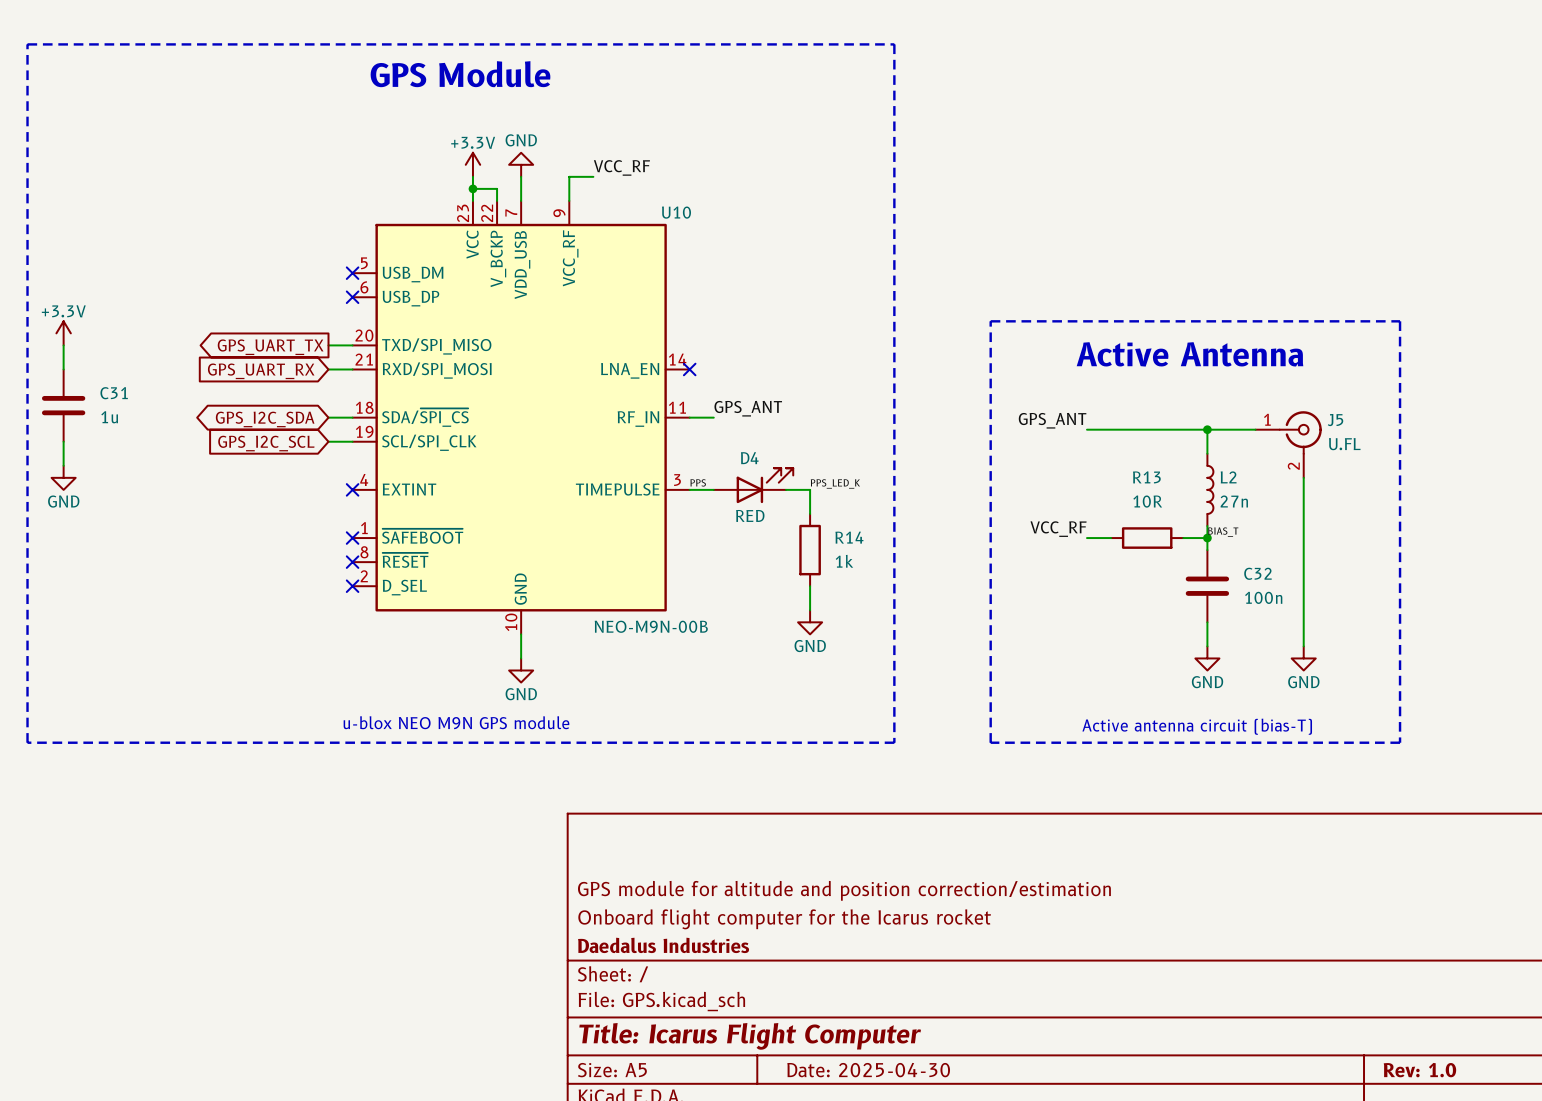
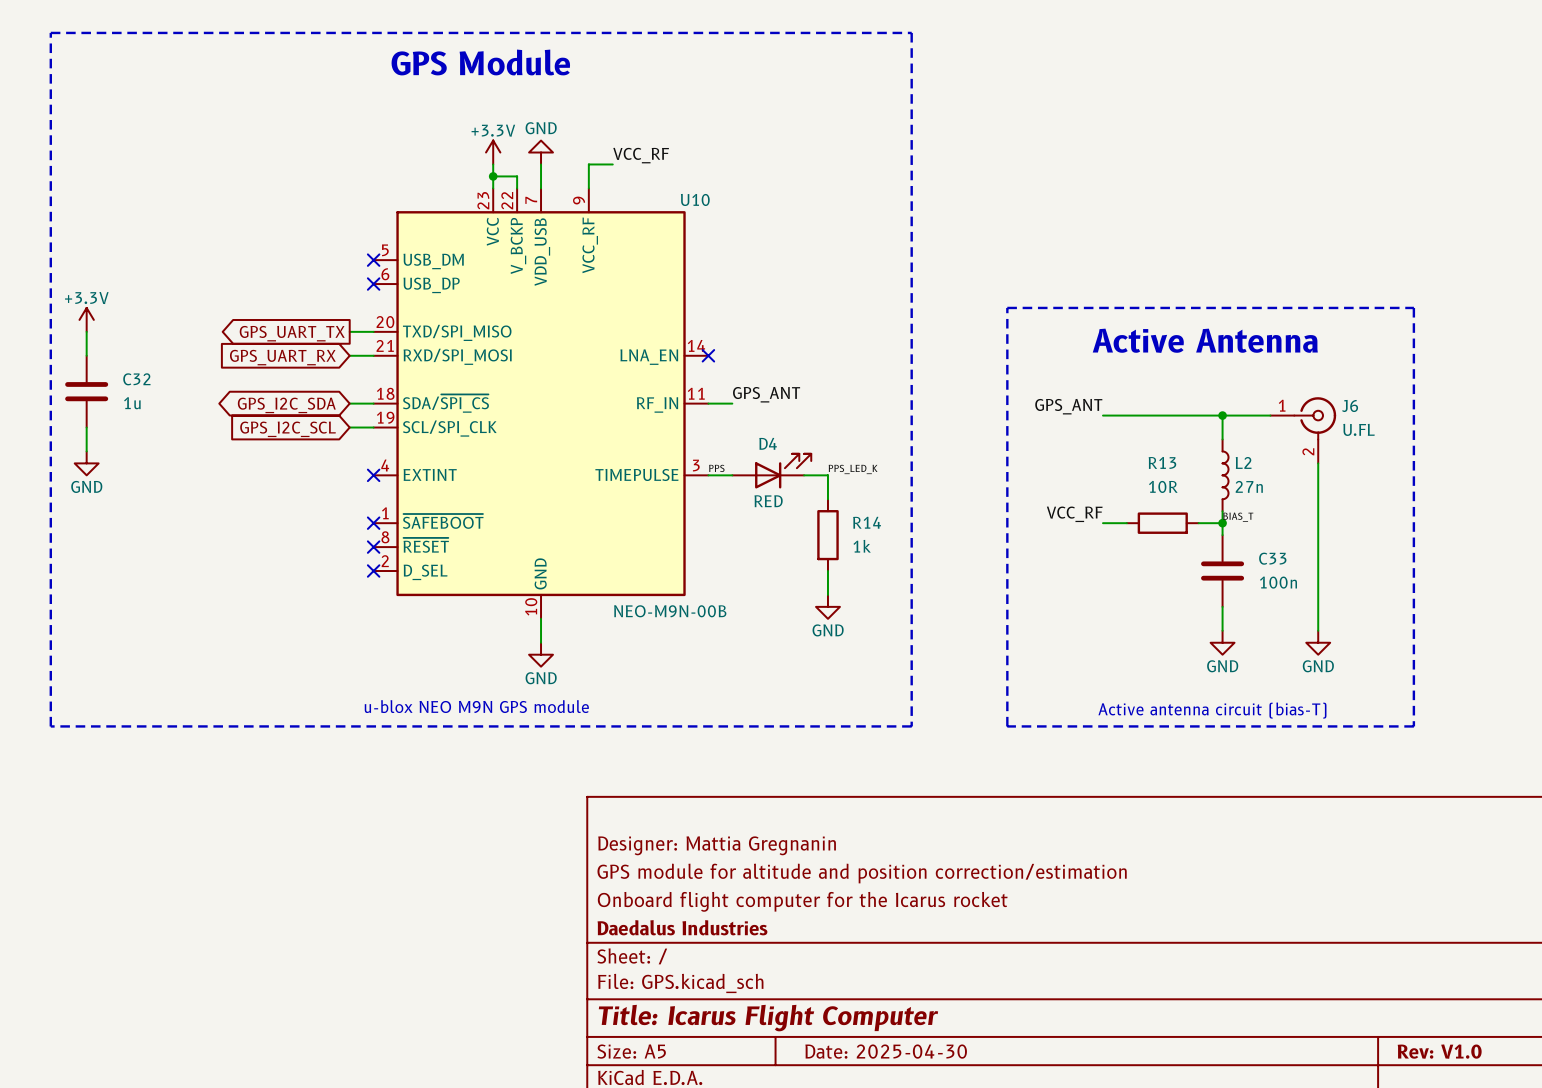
C31 name: C31 (114, 393) -> C32 (136, 379)
J5 name: J5 (1335, 420) -> J6 (1350, 405)
C32 name: C32 (1257, 573) -> C33 (1272, 558)
title block: none -> Designer: Mattia Gregnanin (717, 845)
title block: Rev: 1.0 (1419, 1070) -> Rev: V1.0 (1439, 1051)

